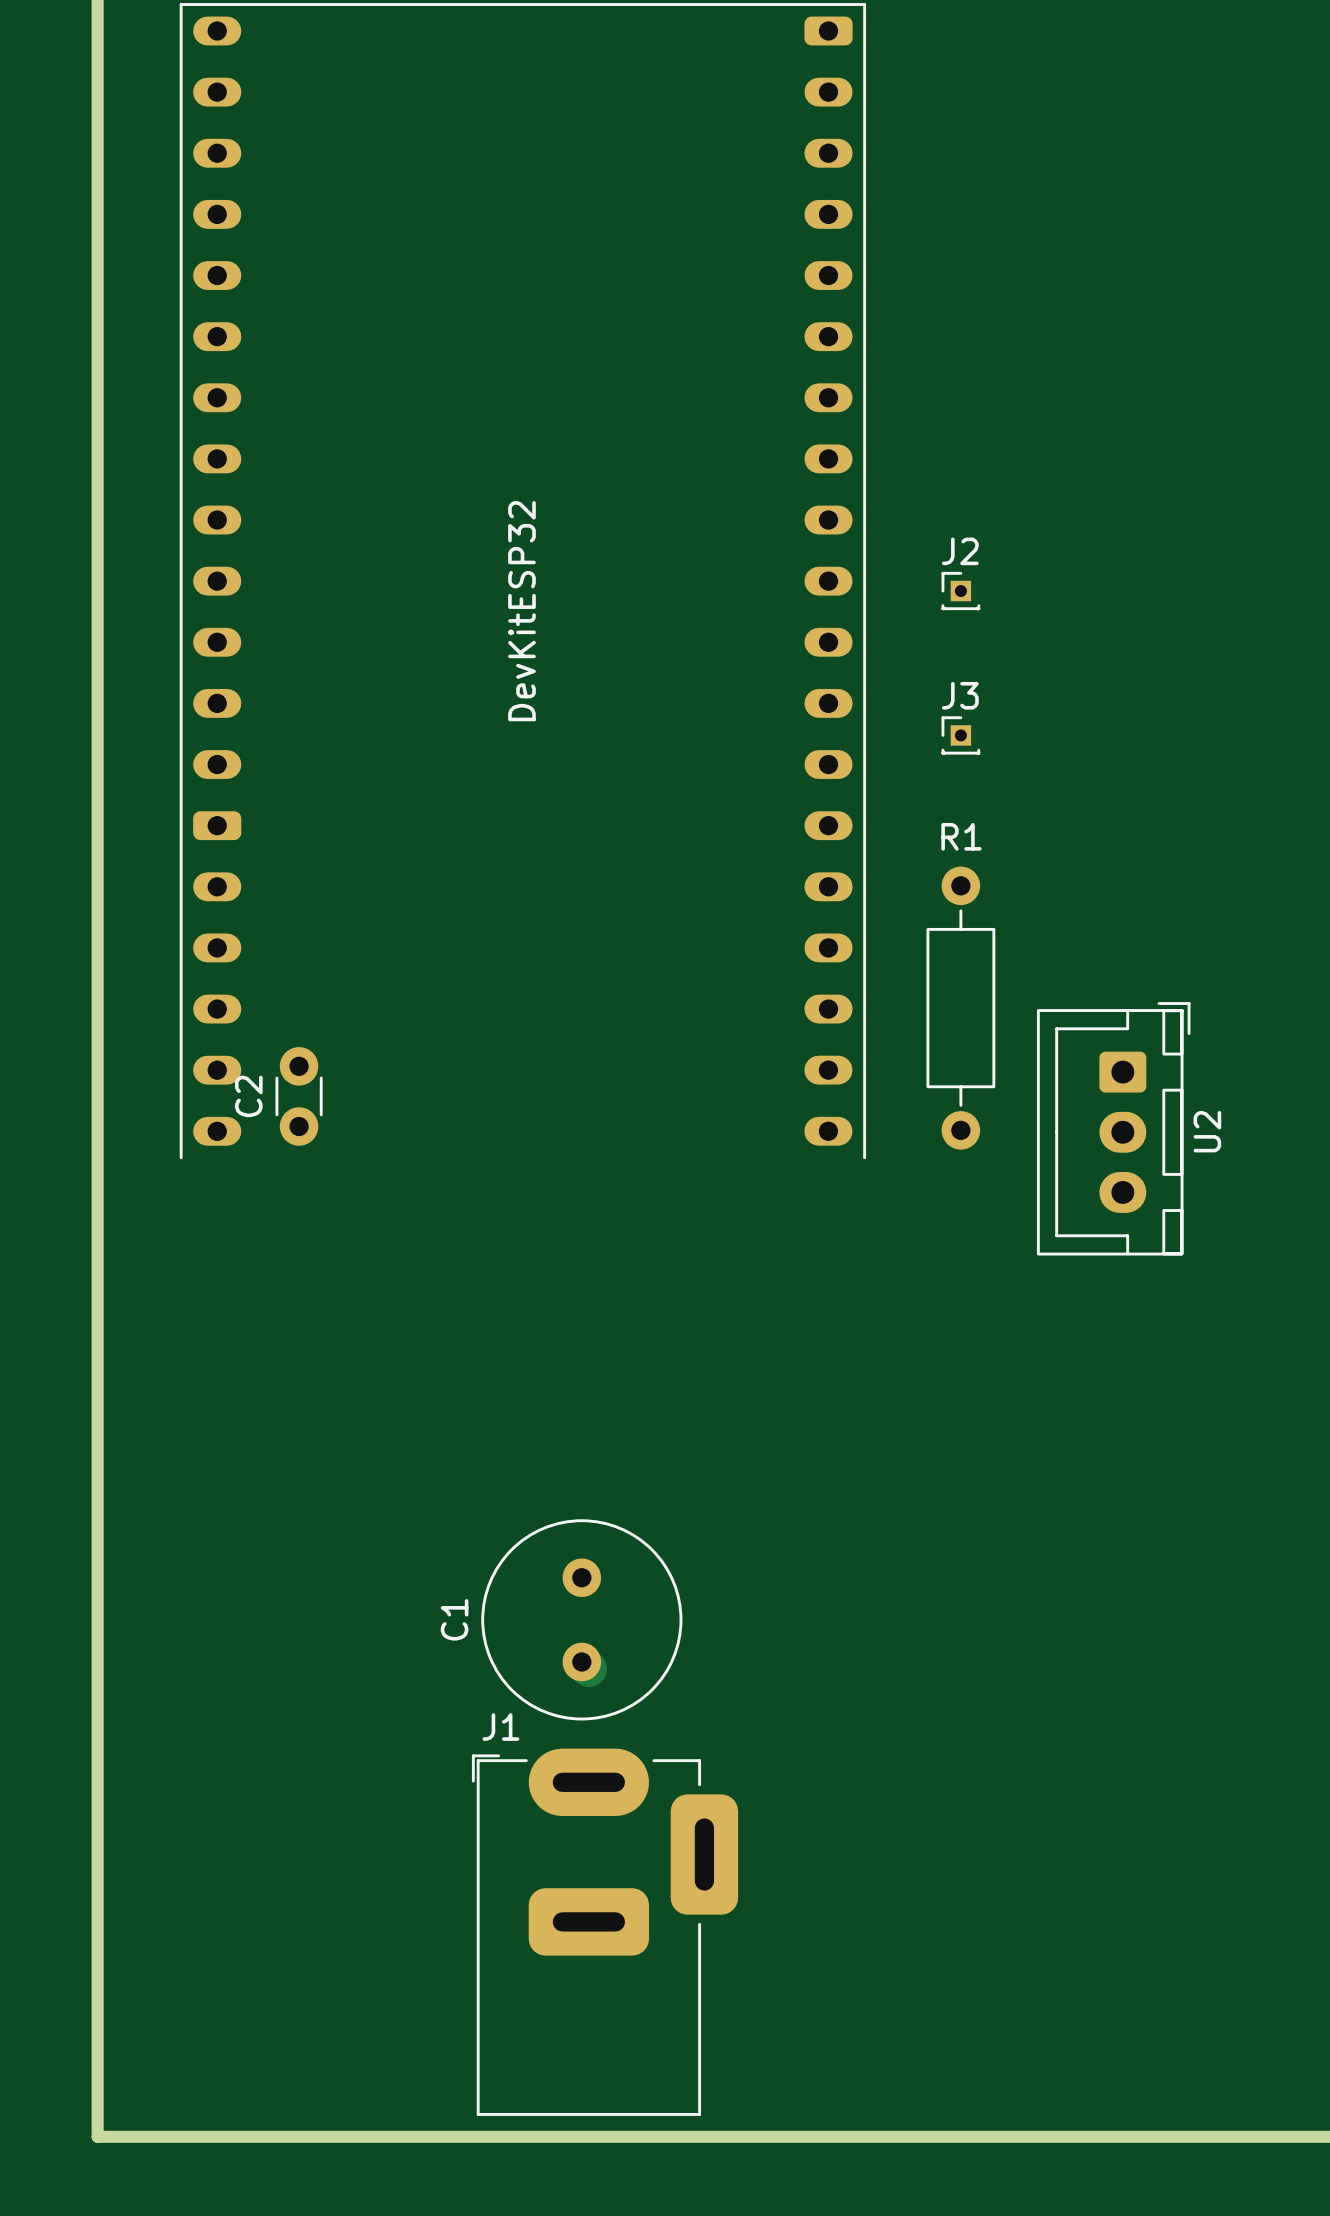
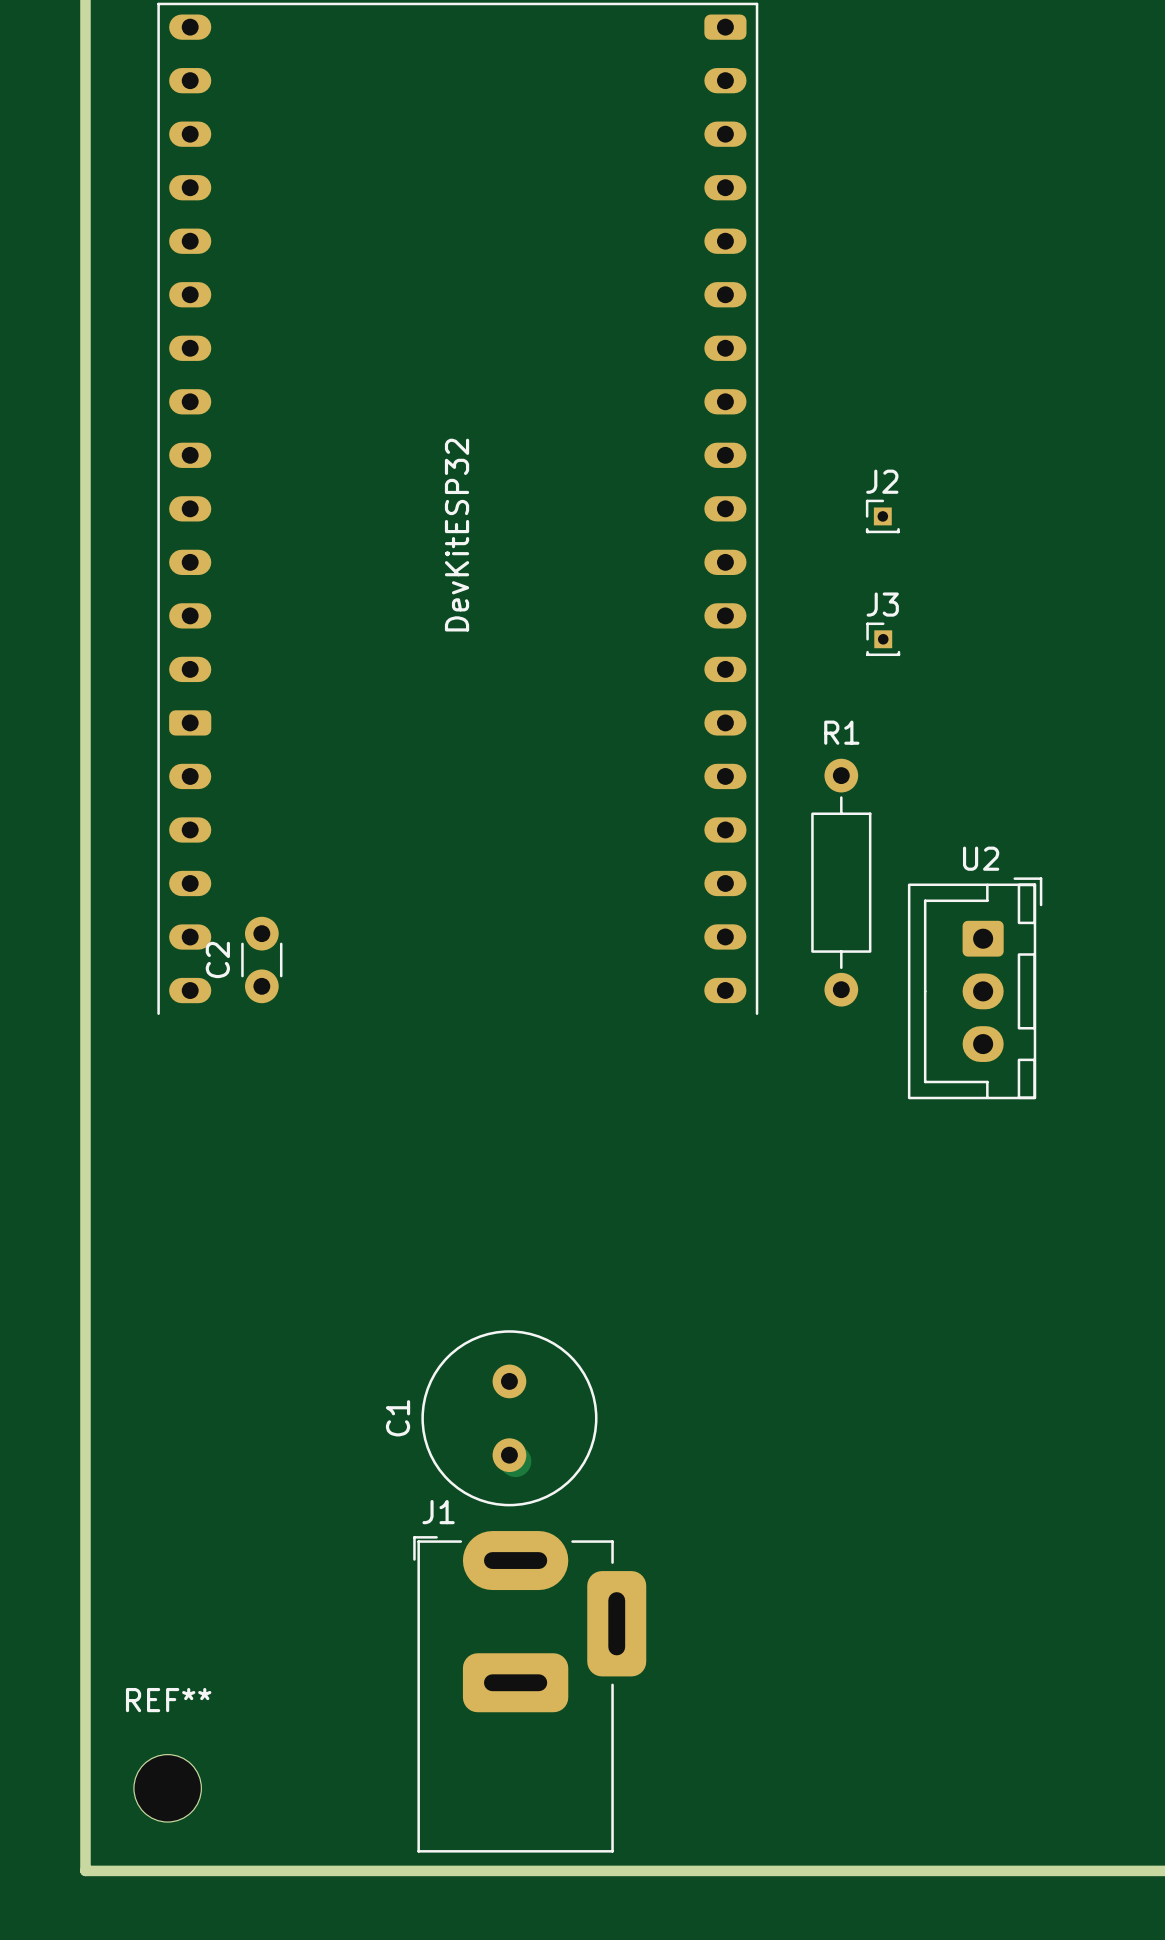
J2 position: (960, 591) -> (882, 516)
J3 position: (960, 735) -> (883, 639)
U2 name rotation: 0° (1207, 1131) -> 90° clockwise (981, 858)
U2 name position: U2 (1207, 1131) -> U2 (981, 858)
REF**: none -> (167, 1788)

